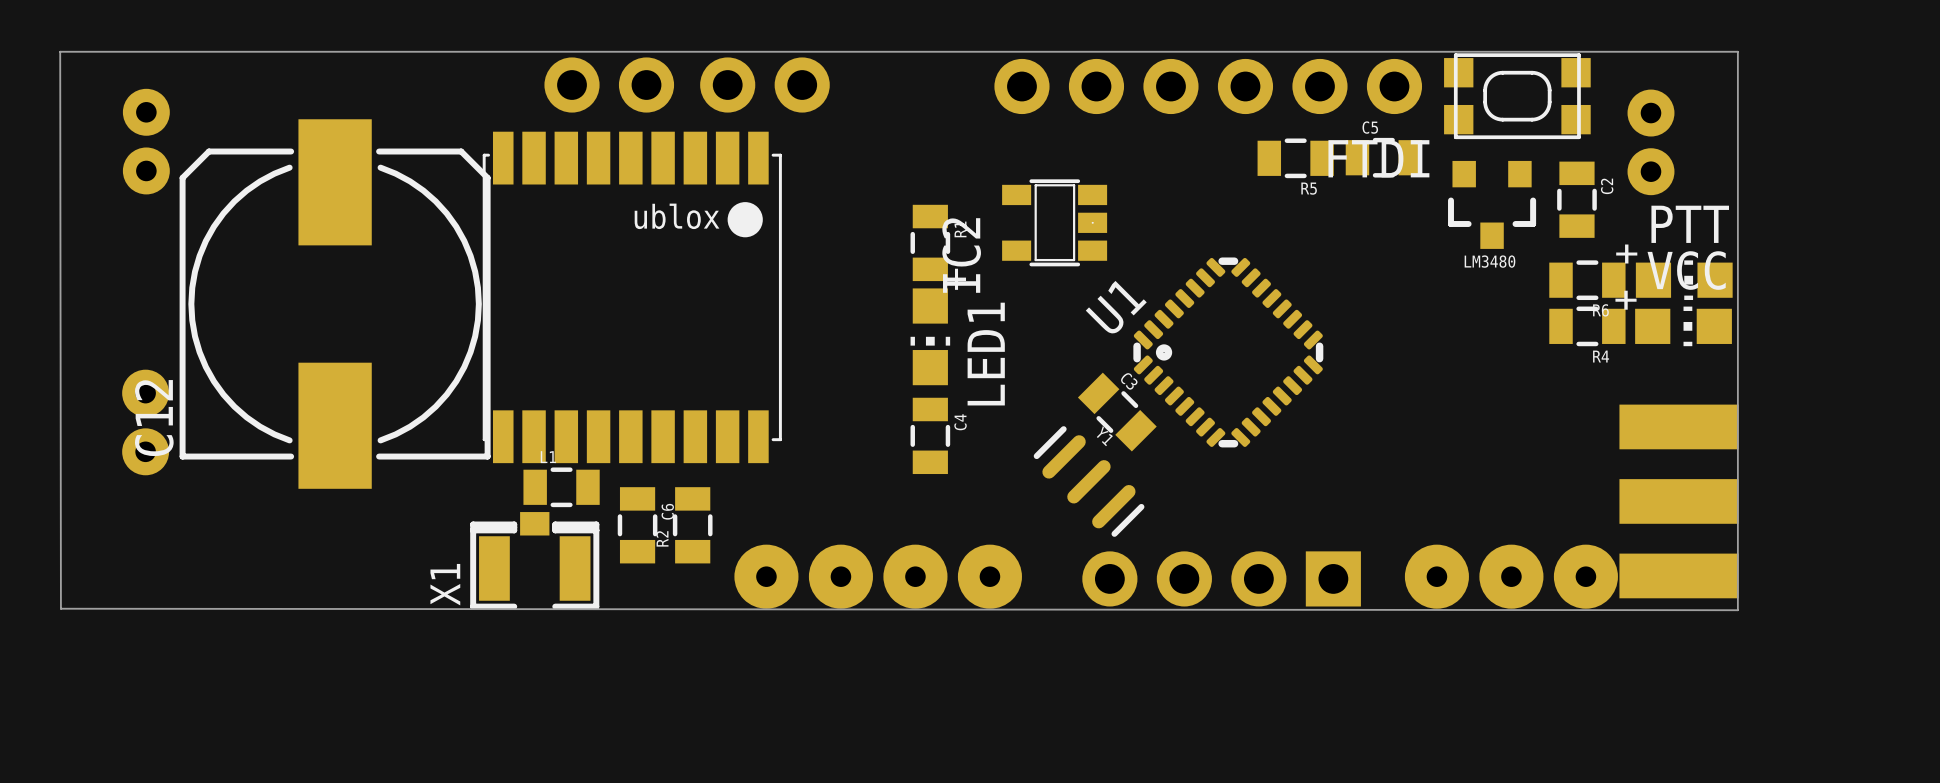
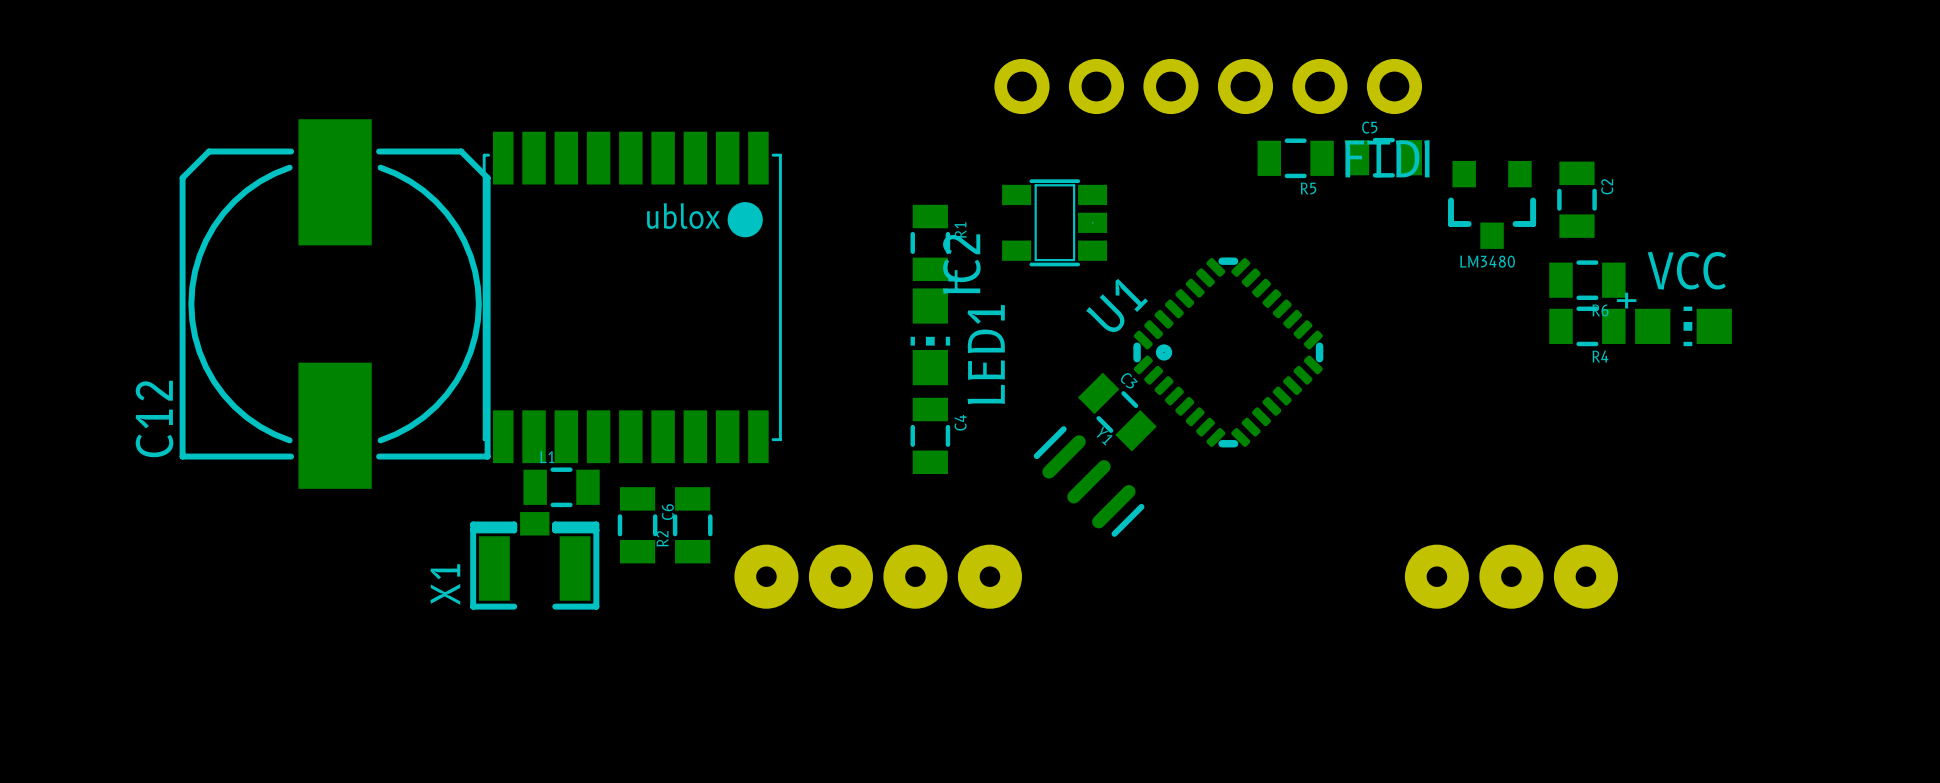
board edge: (1737, 51) (60, 51) (60, 608) (1737, 610) (1737, 51) -> none
part: (609, 85) -> none
part: (764, 85) -> none
part: (1517, 96) -> none
part: (146, 141) -> none
part: (1650, 142) -> none
PTT: (1684, 280) -> none
part: (145, 422) -> none
part: (1679, 501) -> none
part: (1221, 578) -> none

